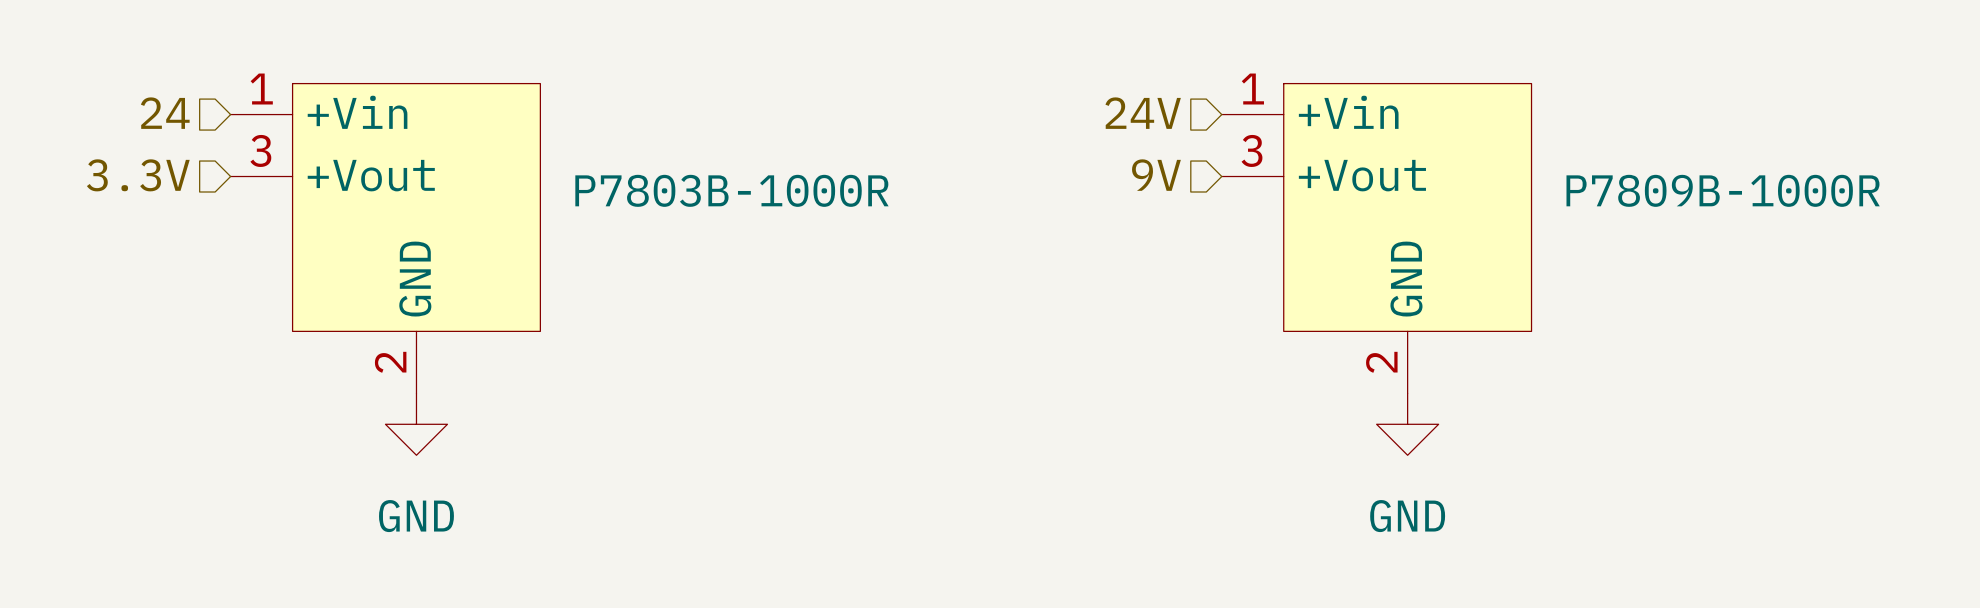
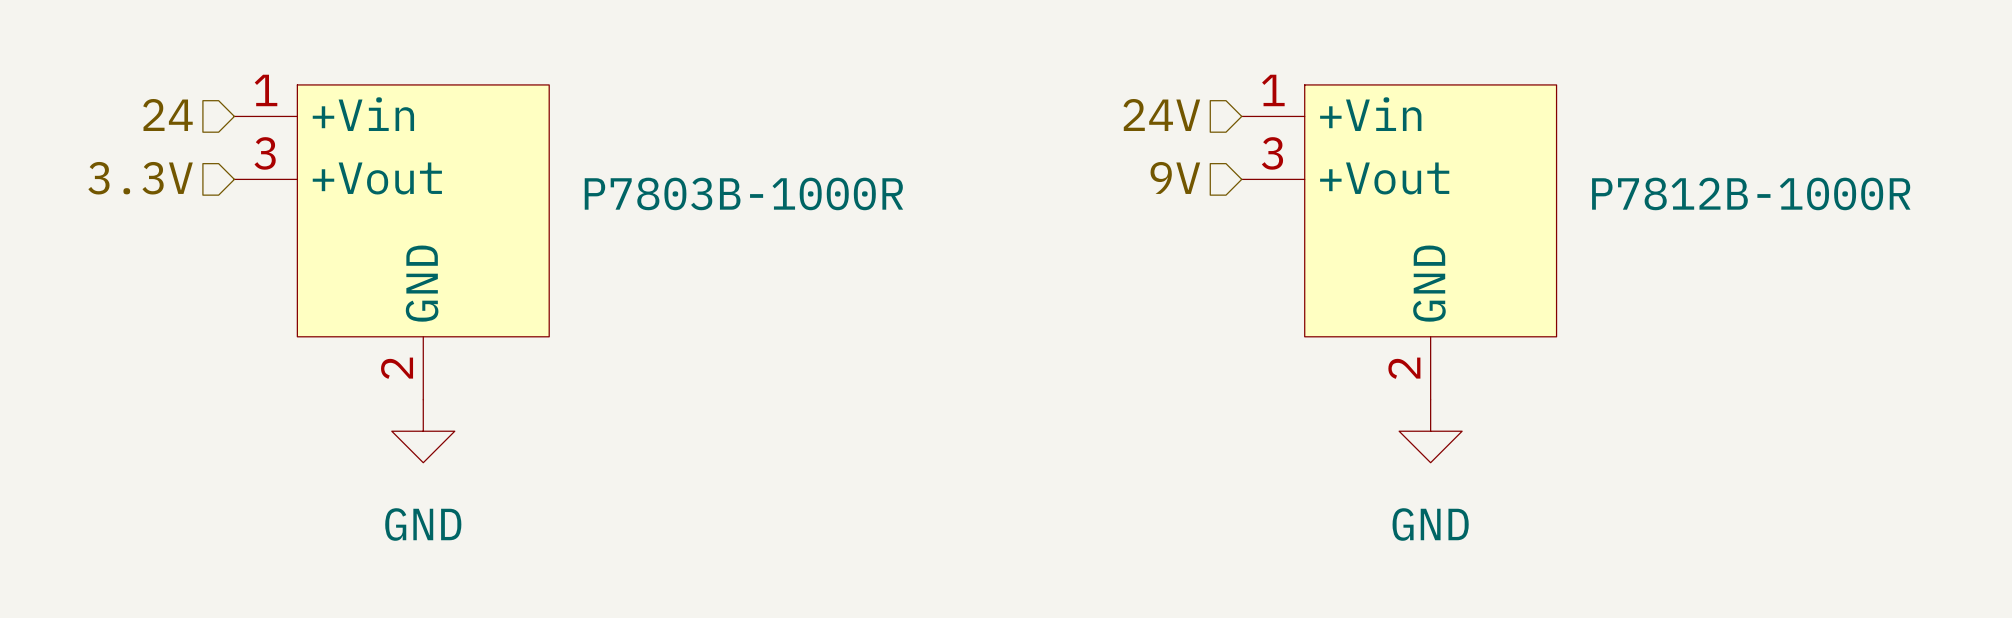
P7809B-1000R name: P7809B-1000R (1723, 190) -> P7812B-1000R (1751, 193)

